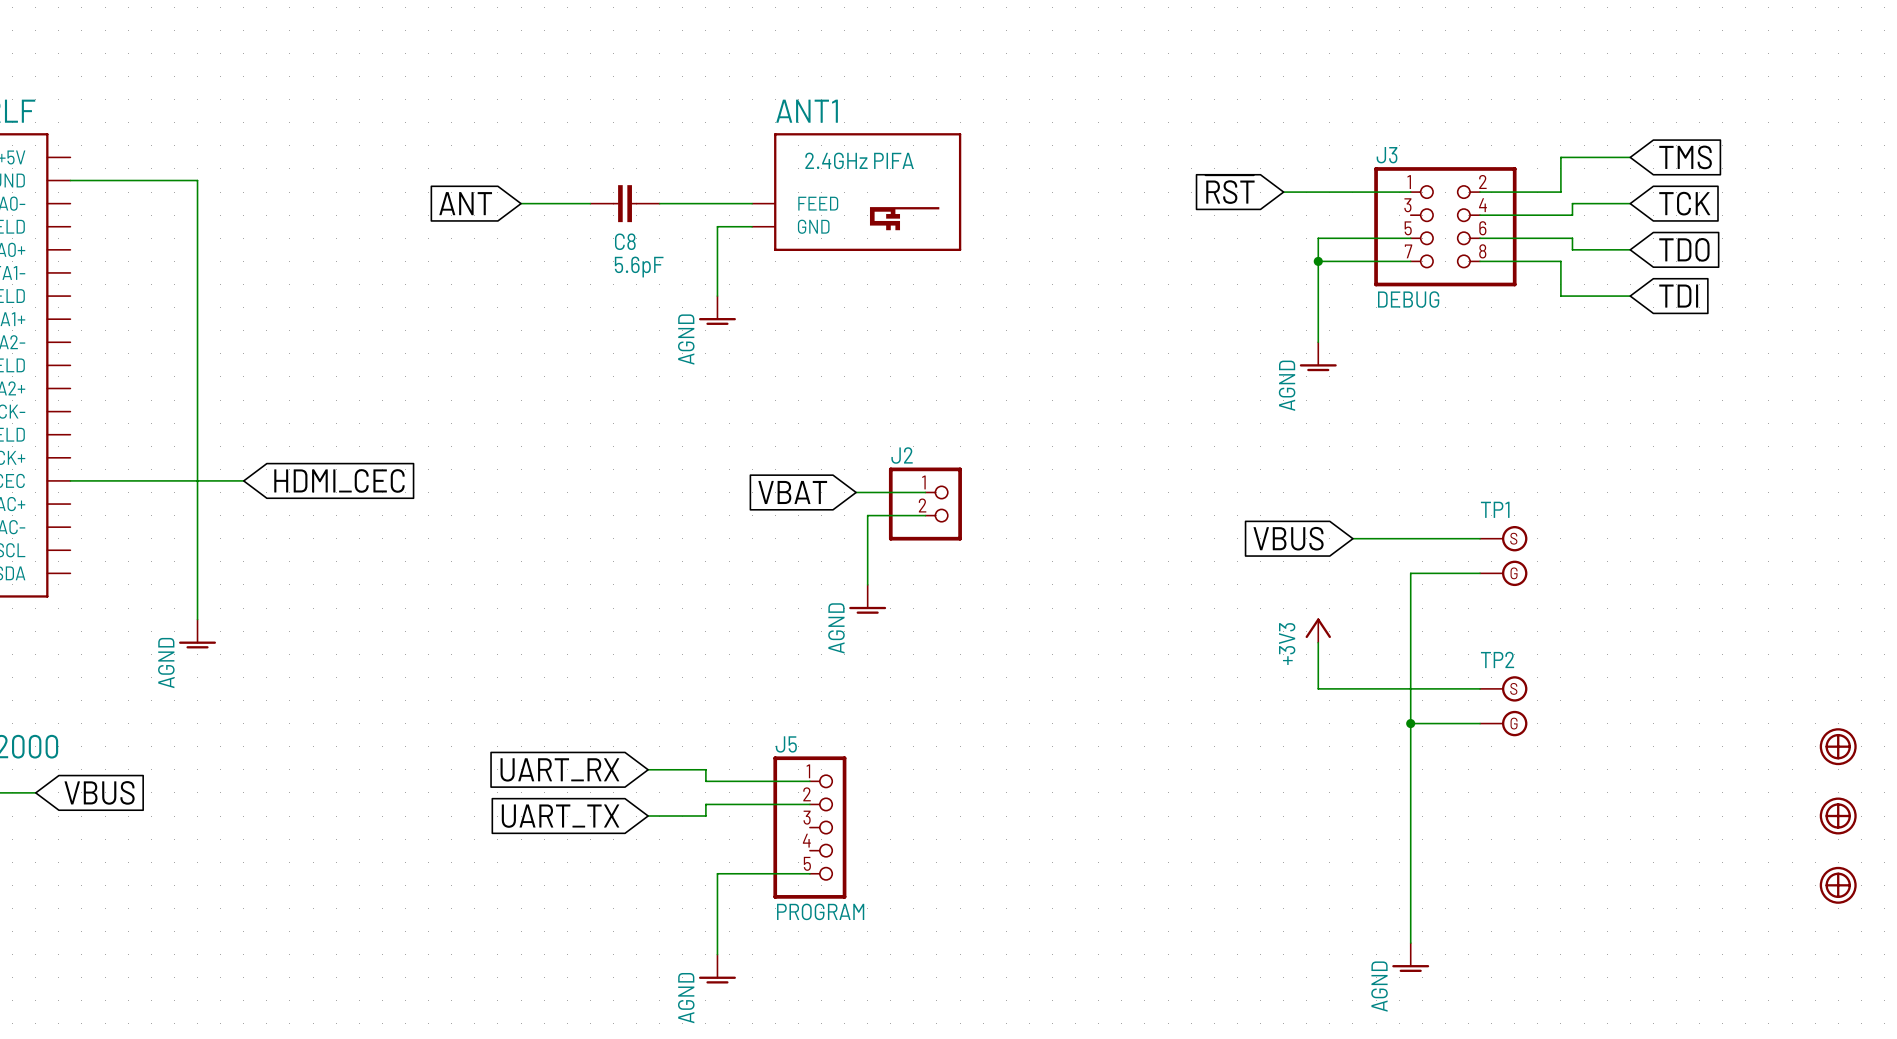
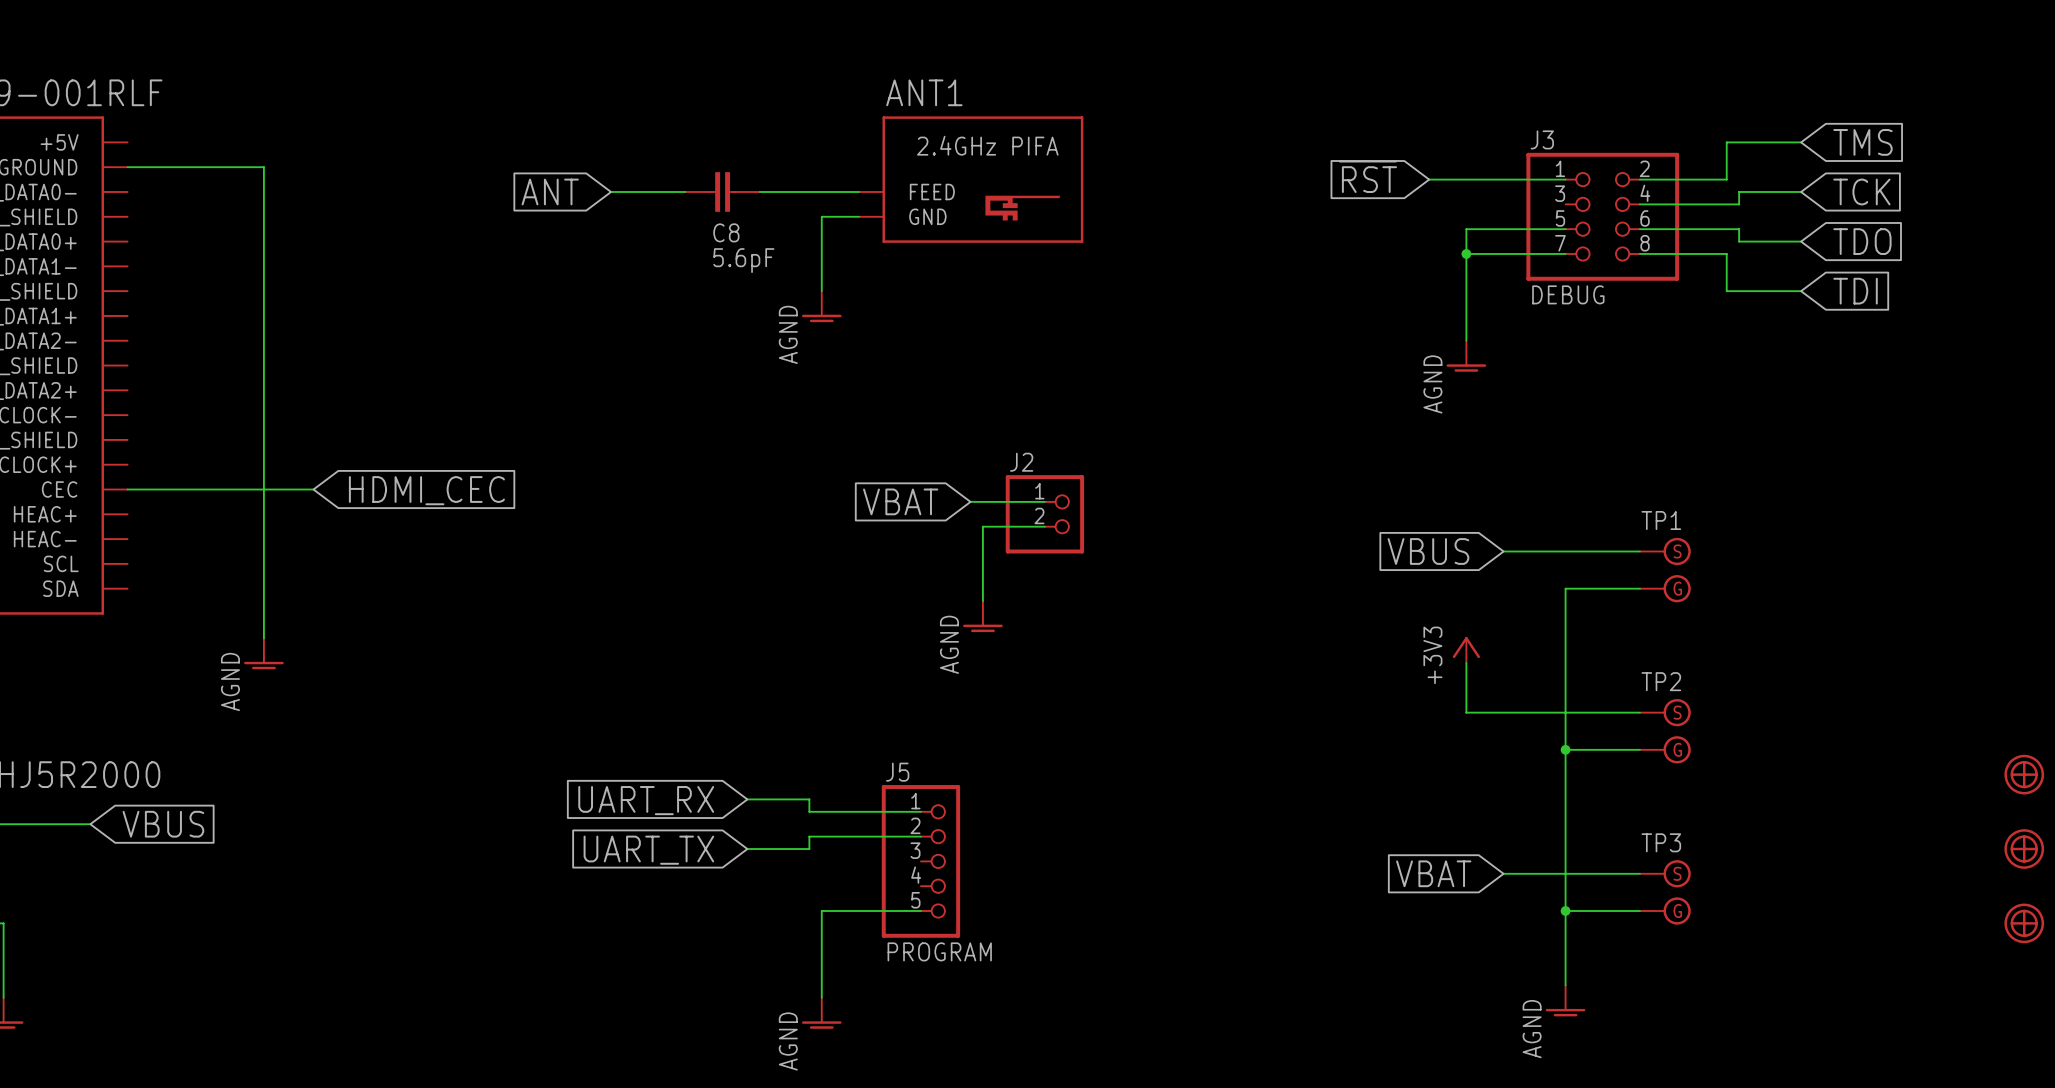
global label: none -> VBAT (1433, 873)
wire: none -> (1503, 873) (1639, 873)
TP3: none -> (1665, 892)
wire: none -> (1565, 910) (1639, 910)
junction: none -> (1565, 910)

